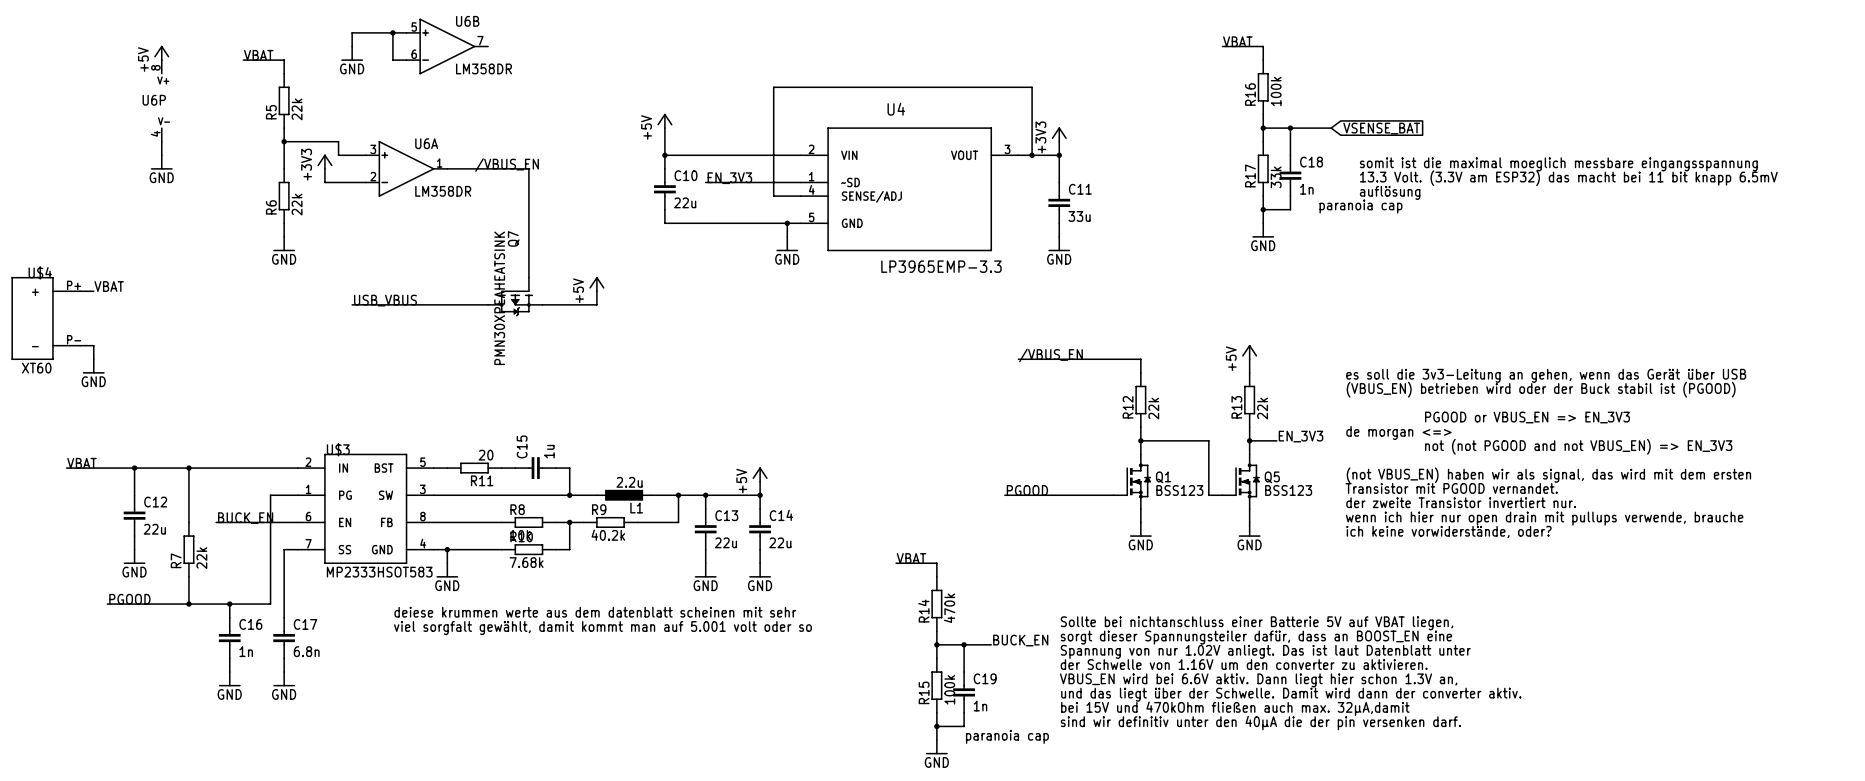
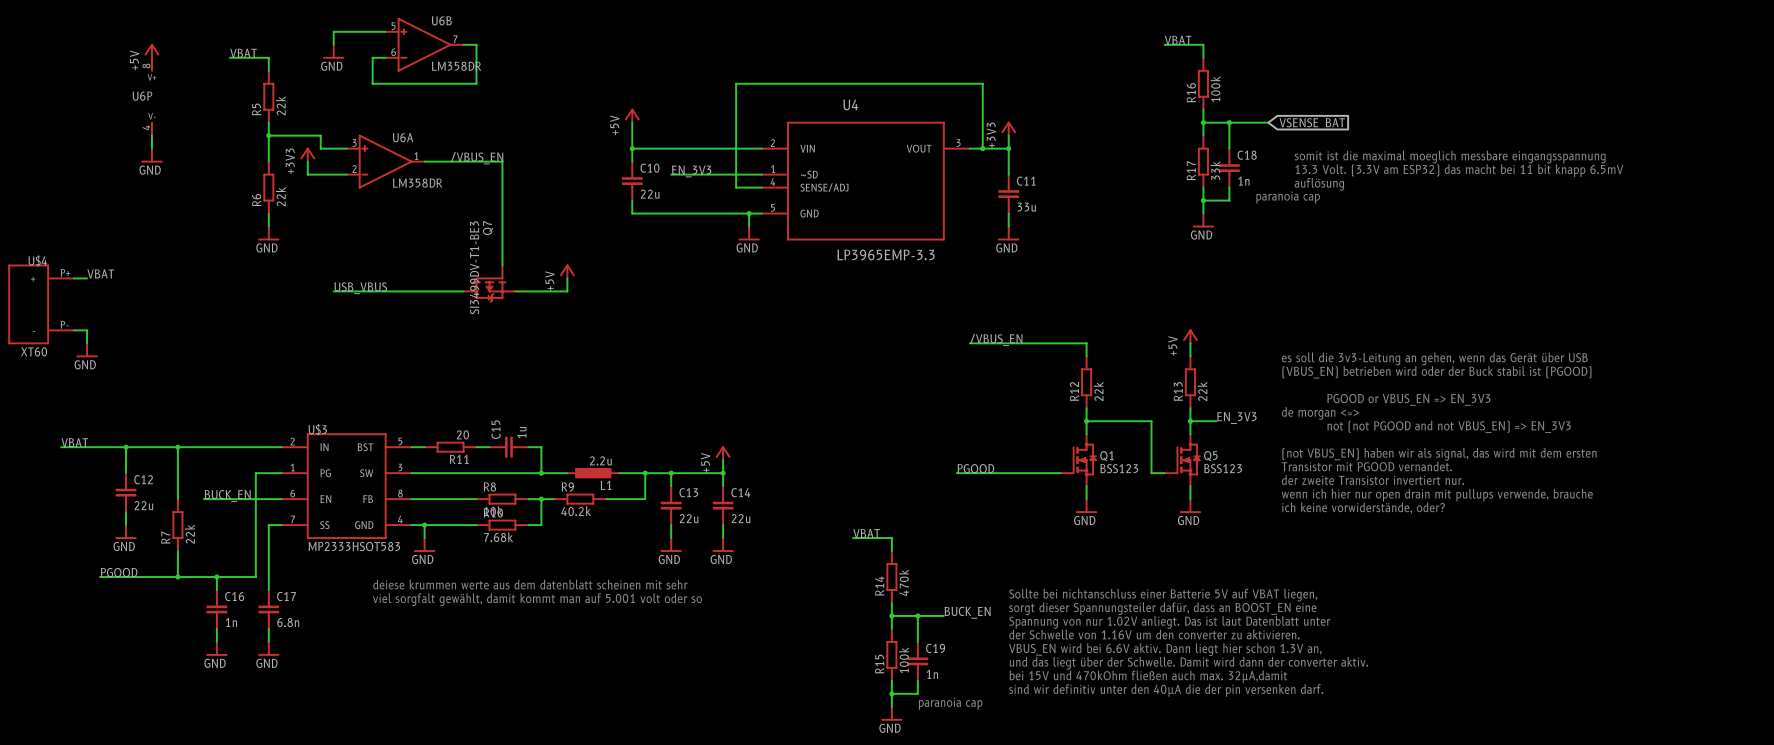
wire: (392, 32) (392, 60) -> (463, 44) (476, 44) (476, 83) (372, 83) (372, 57)
junction: (392, 32) -> none
Q7 value: PMN30XPEAHEATSINK (499, 298) -> SI3499DV-T1-BE3 (474, 267)

